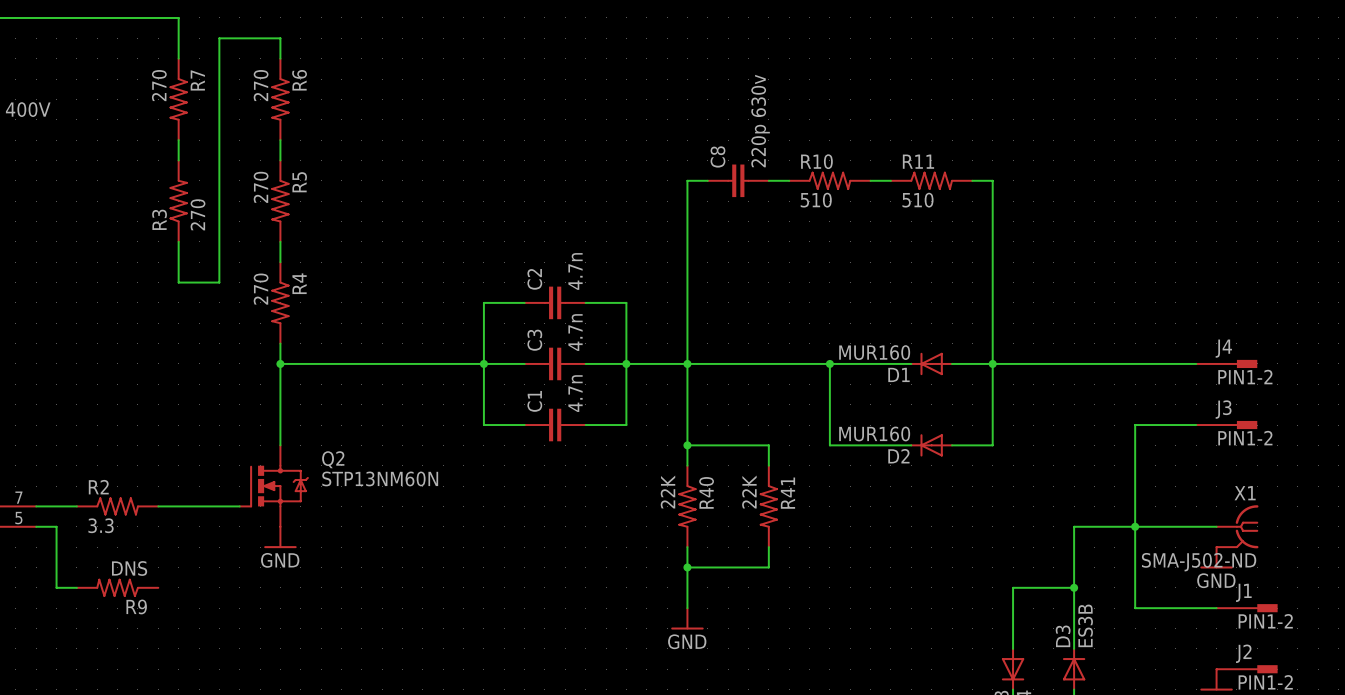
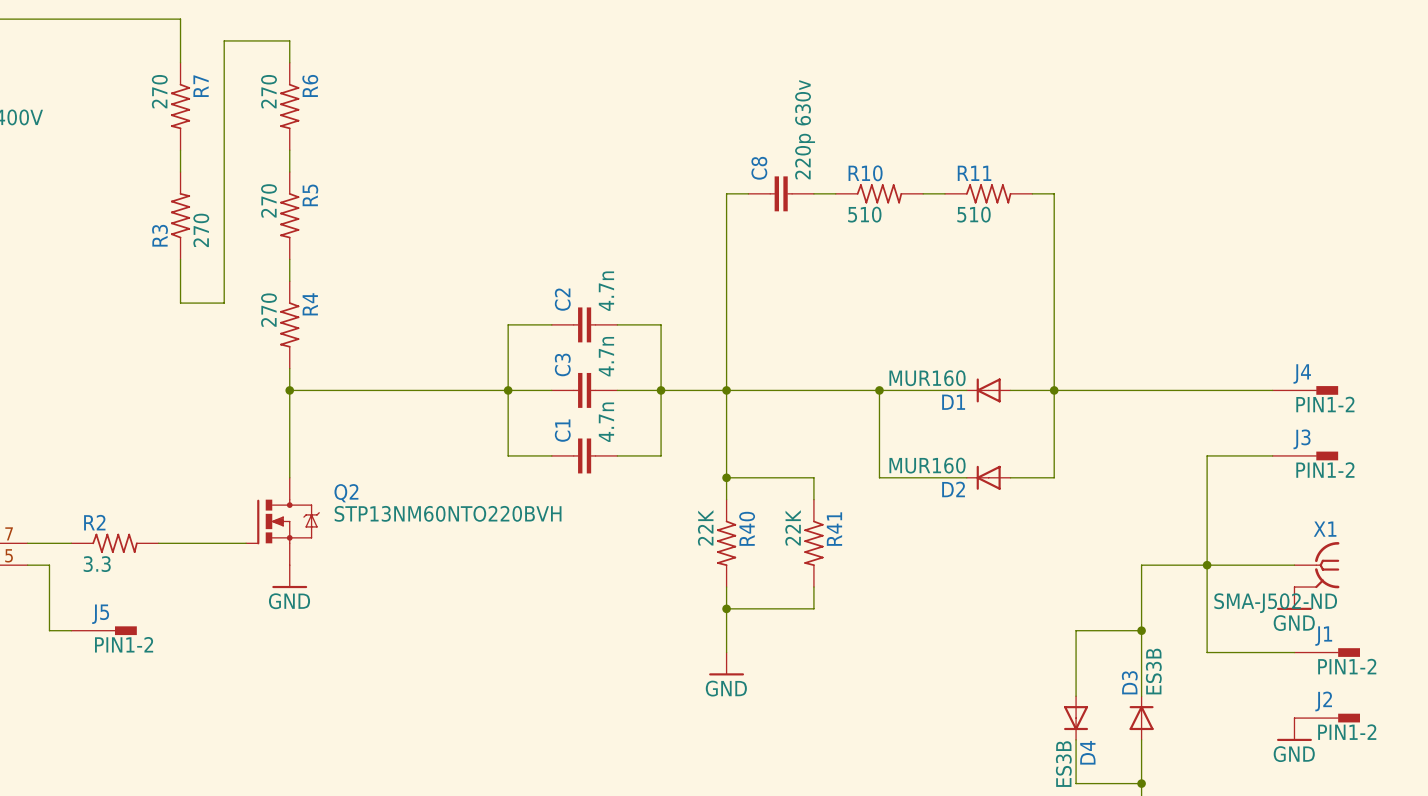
Q2 value: STP13NM60N (380, 478) -> STP13NM60NTO220BVH (448, 513)
J5: none -> PIN1-2 (104, 630)
R9: DNS (117, 587) -> none

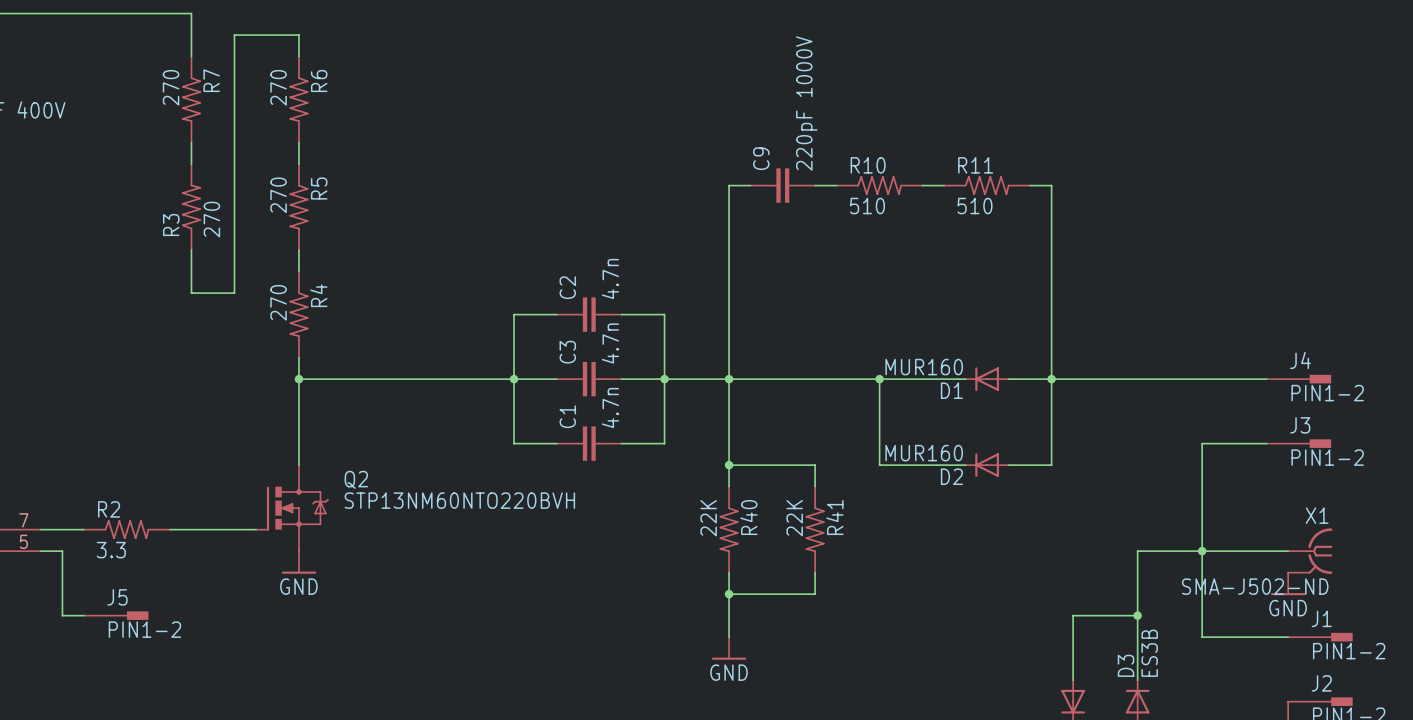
C8 value: 220p 630v (805, 129) -> 220pF 1000V (806, 103)
C8 name: C8 (759, 168) -> C9 (761, 158)

